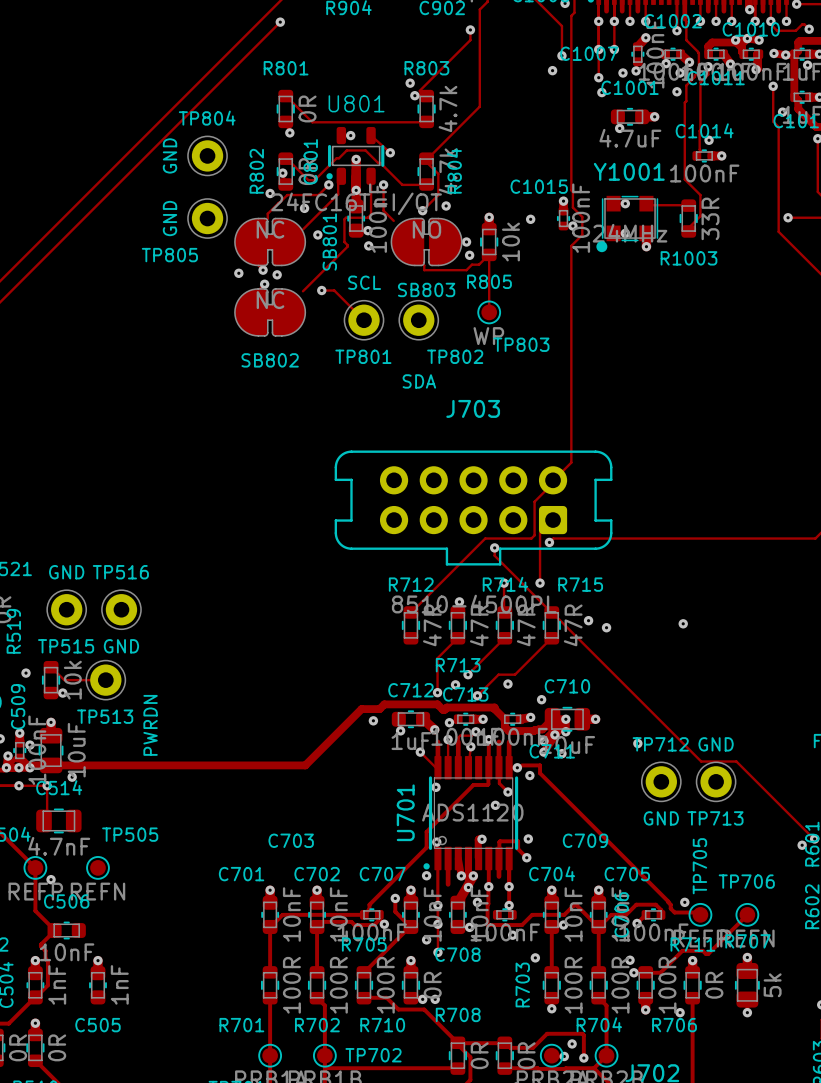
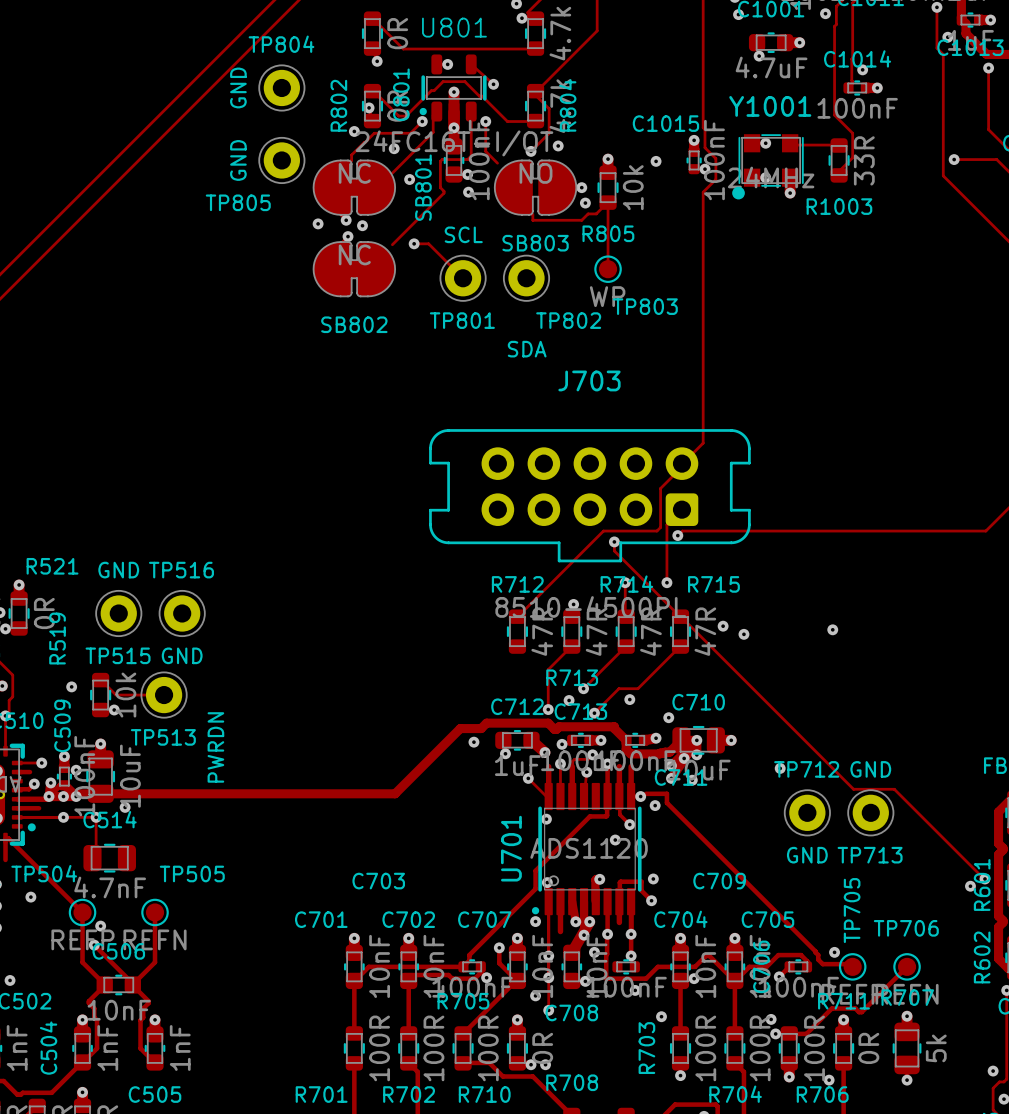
track: none -> (155, 913) (155, 962) (133, 984)
track: none -> (94, 945) (132, 983)
via: none -> (94, 945)
track: none -> (133, 985) (148, 1001) (143, 1008) (143, 1017) (140, 1020) (140, 1048) (154, 1062)

